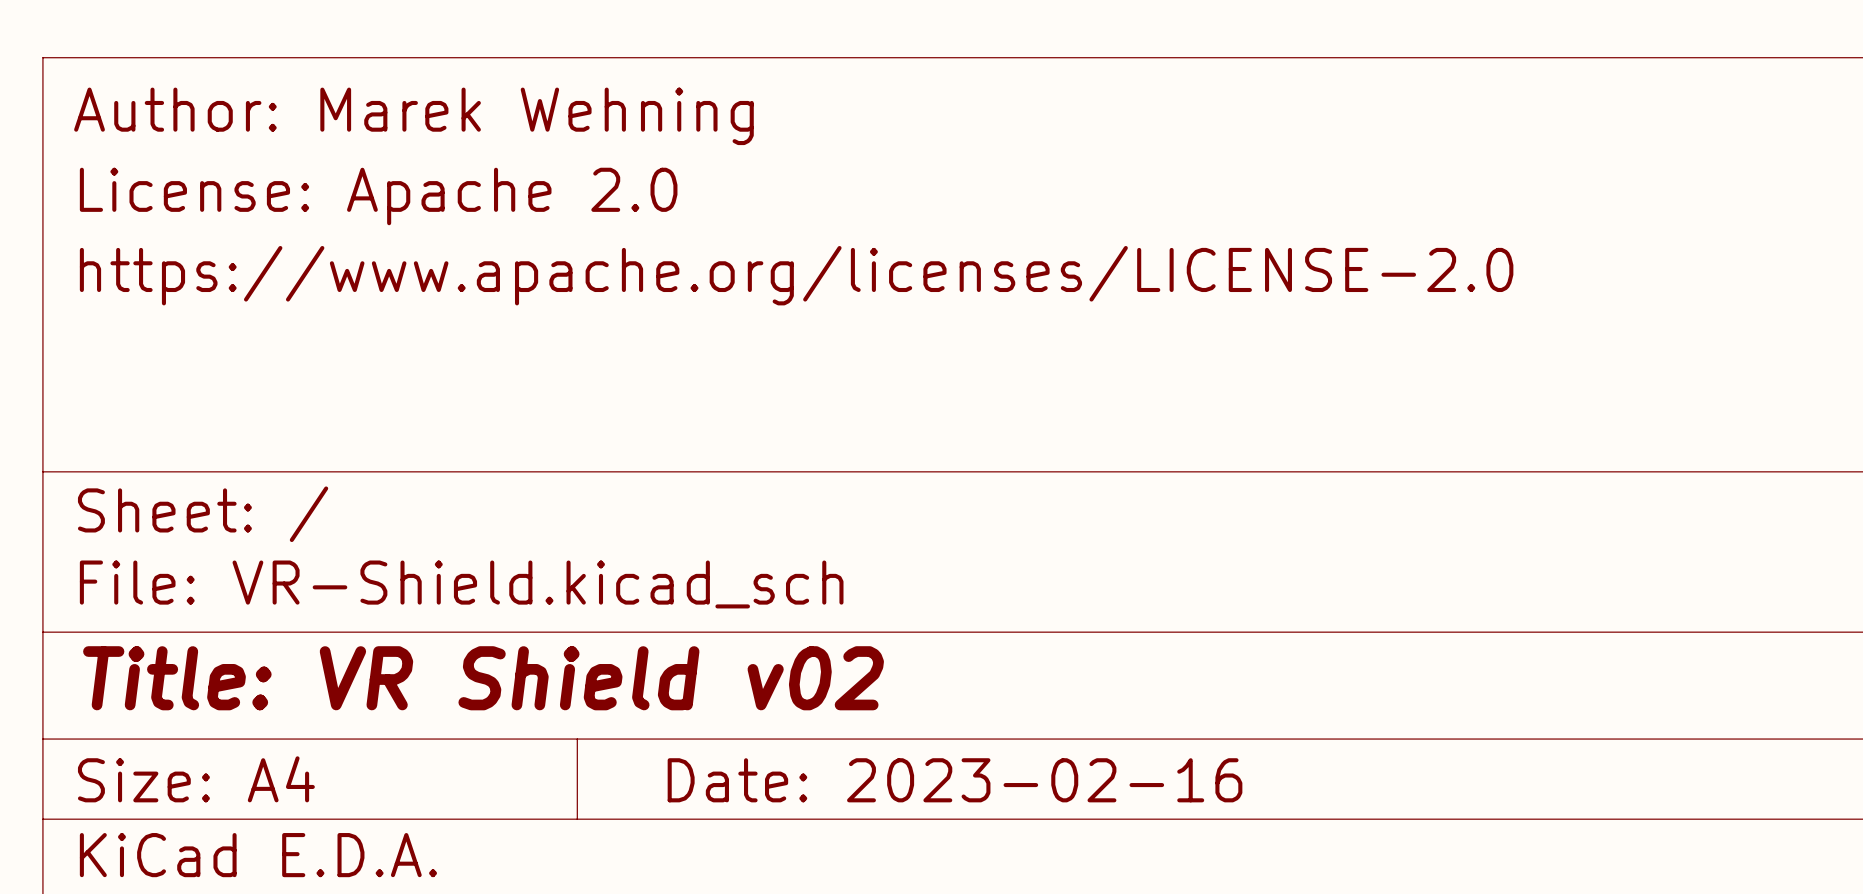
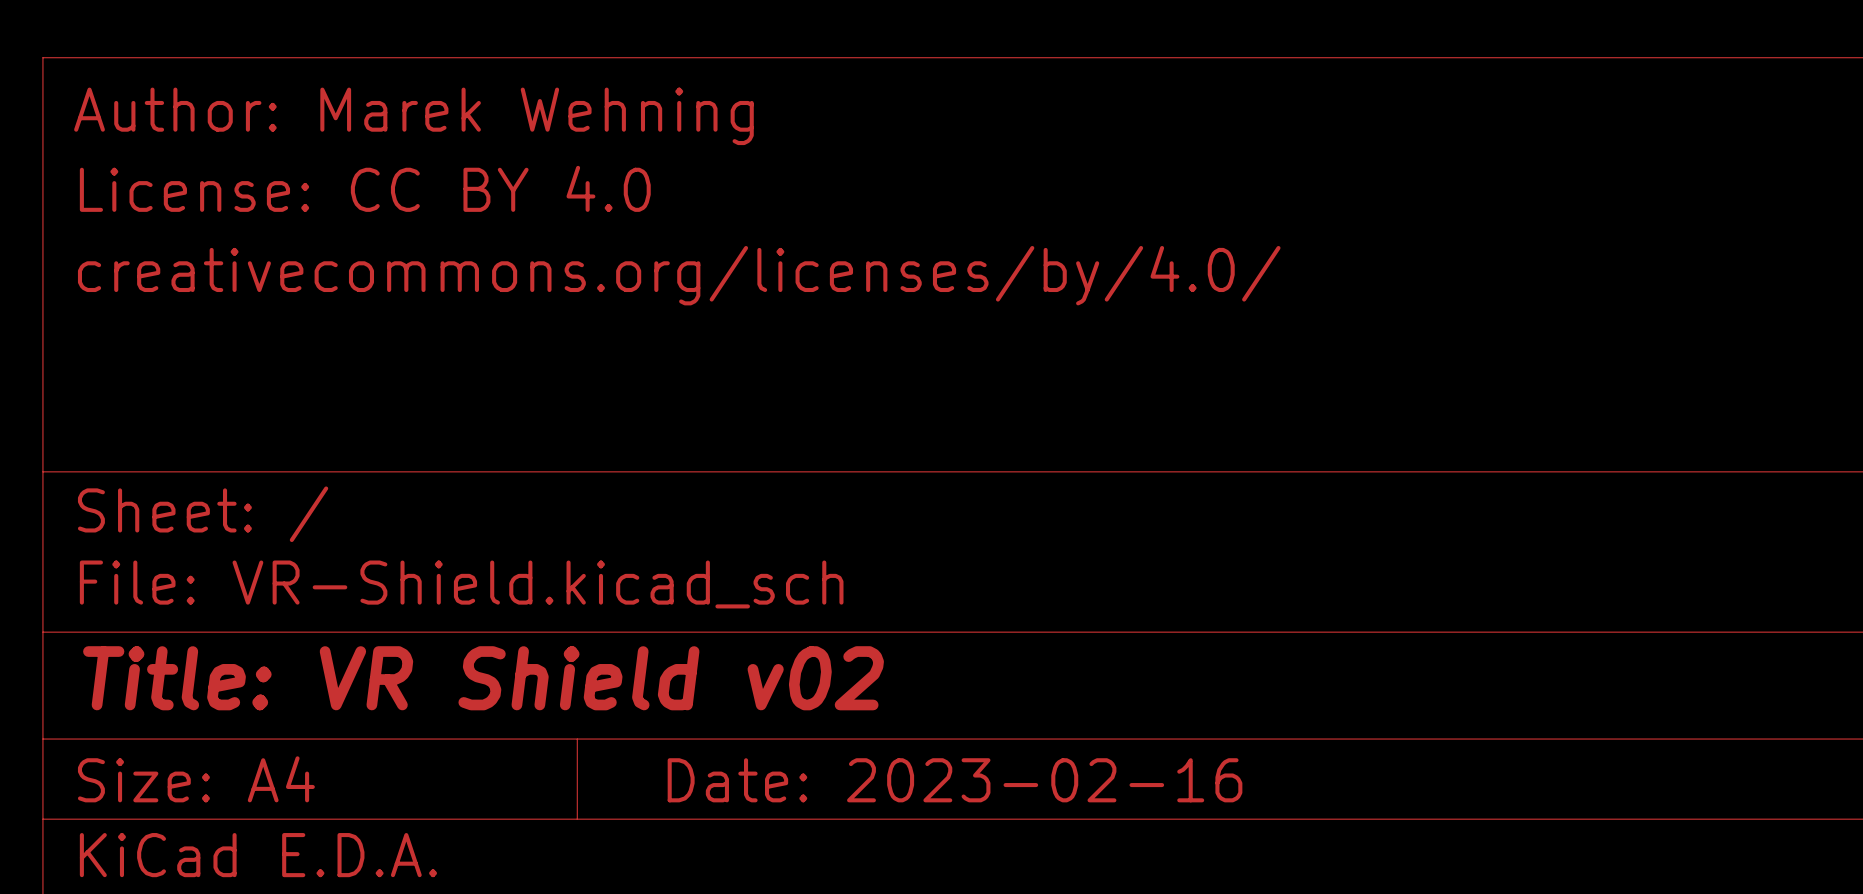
title block: License: Apache 2.0 (378, 196) -> License: CC BY 4.0 (365, 188)
title block: https://www.apache.org/licenses/LICENSE-2.0 (796, 275) -> creativecommons.org/licenses/by/4.0/ (679, 275)

